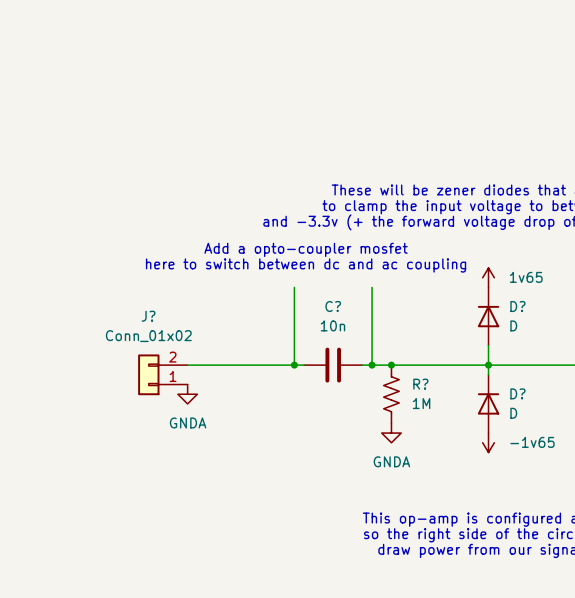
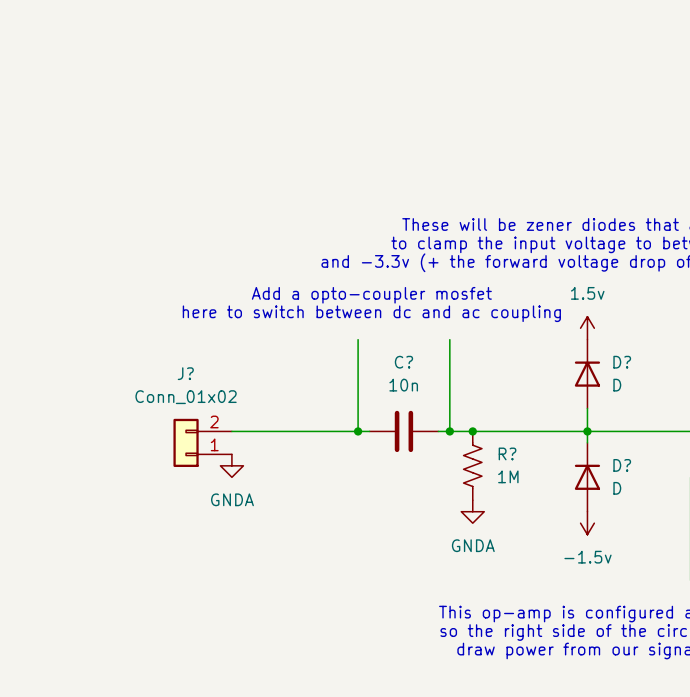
power symbol: 1v65 (488, 277) -> 1.5v (587, 328)
power symbol: -1v65 (488, 442) -> -1.5v (587, 523)

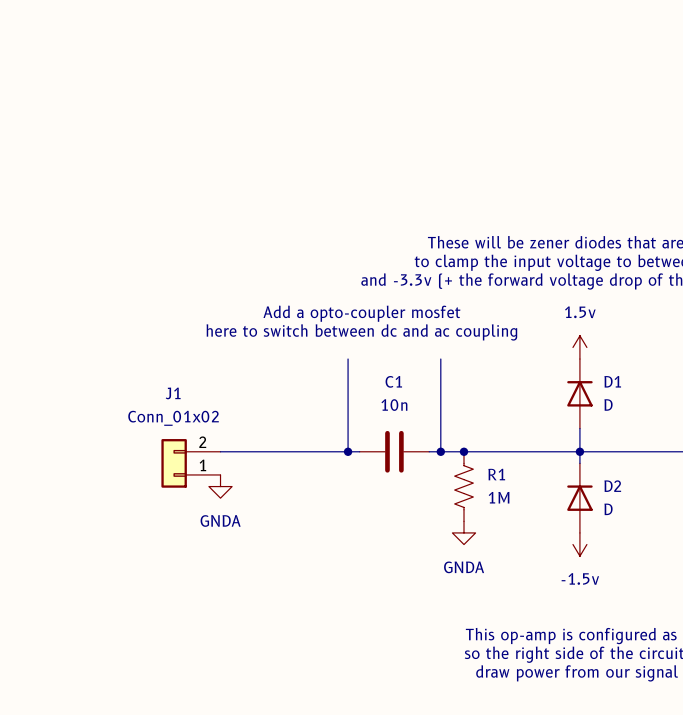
C? name: C? (403, 362) -> C1 (393, 381)
D? name: D? (622, 362) -> D1 (612, 381)
J? name: J? (185, 373) -> J1 (173, 393)
R? name: R? (507, 453) -> R1 (496, 474)
D? name: D? (622, 465) -> D2 (612, 486)

